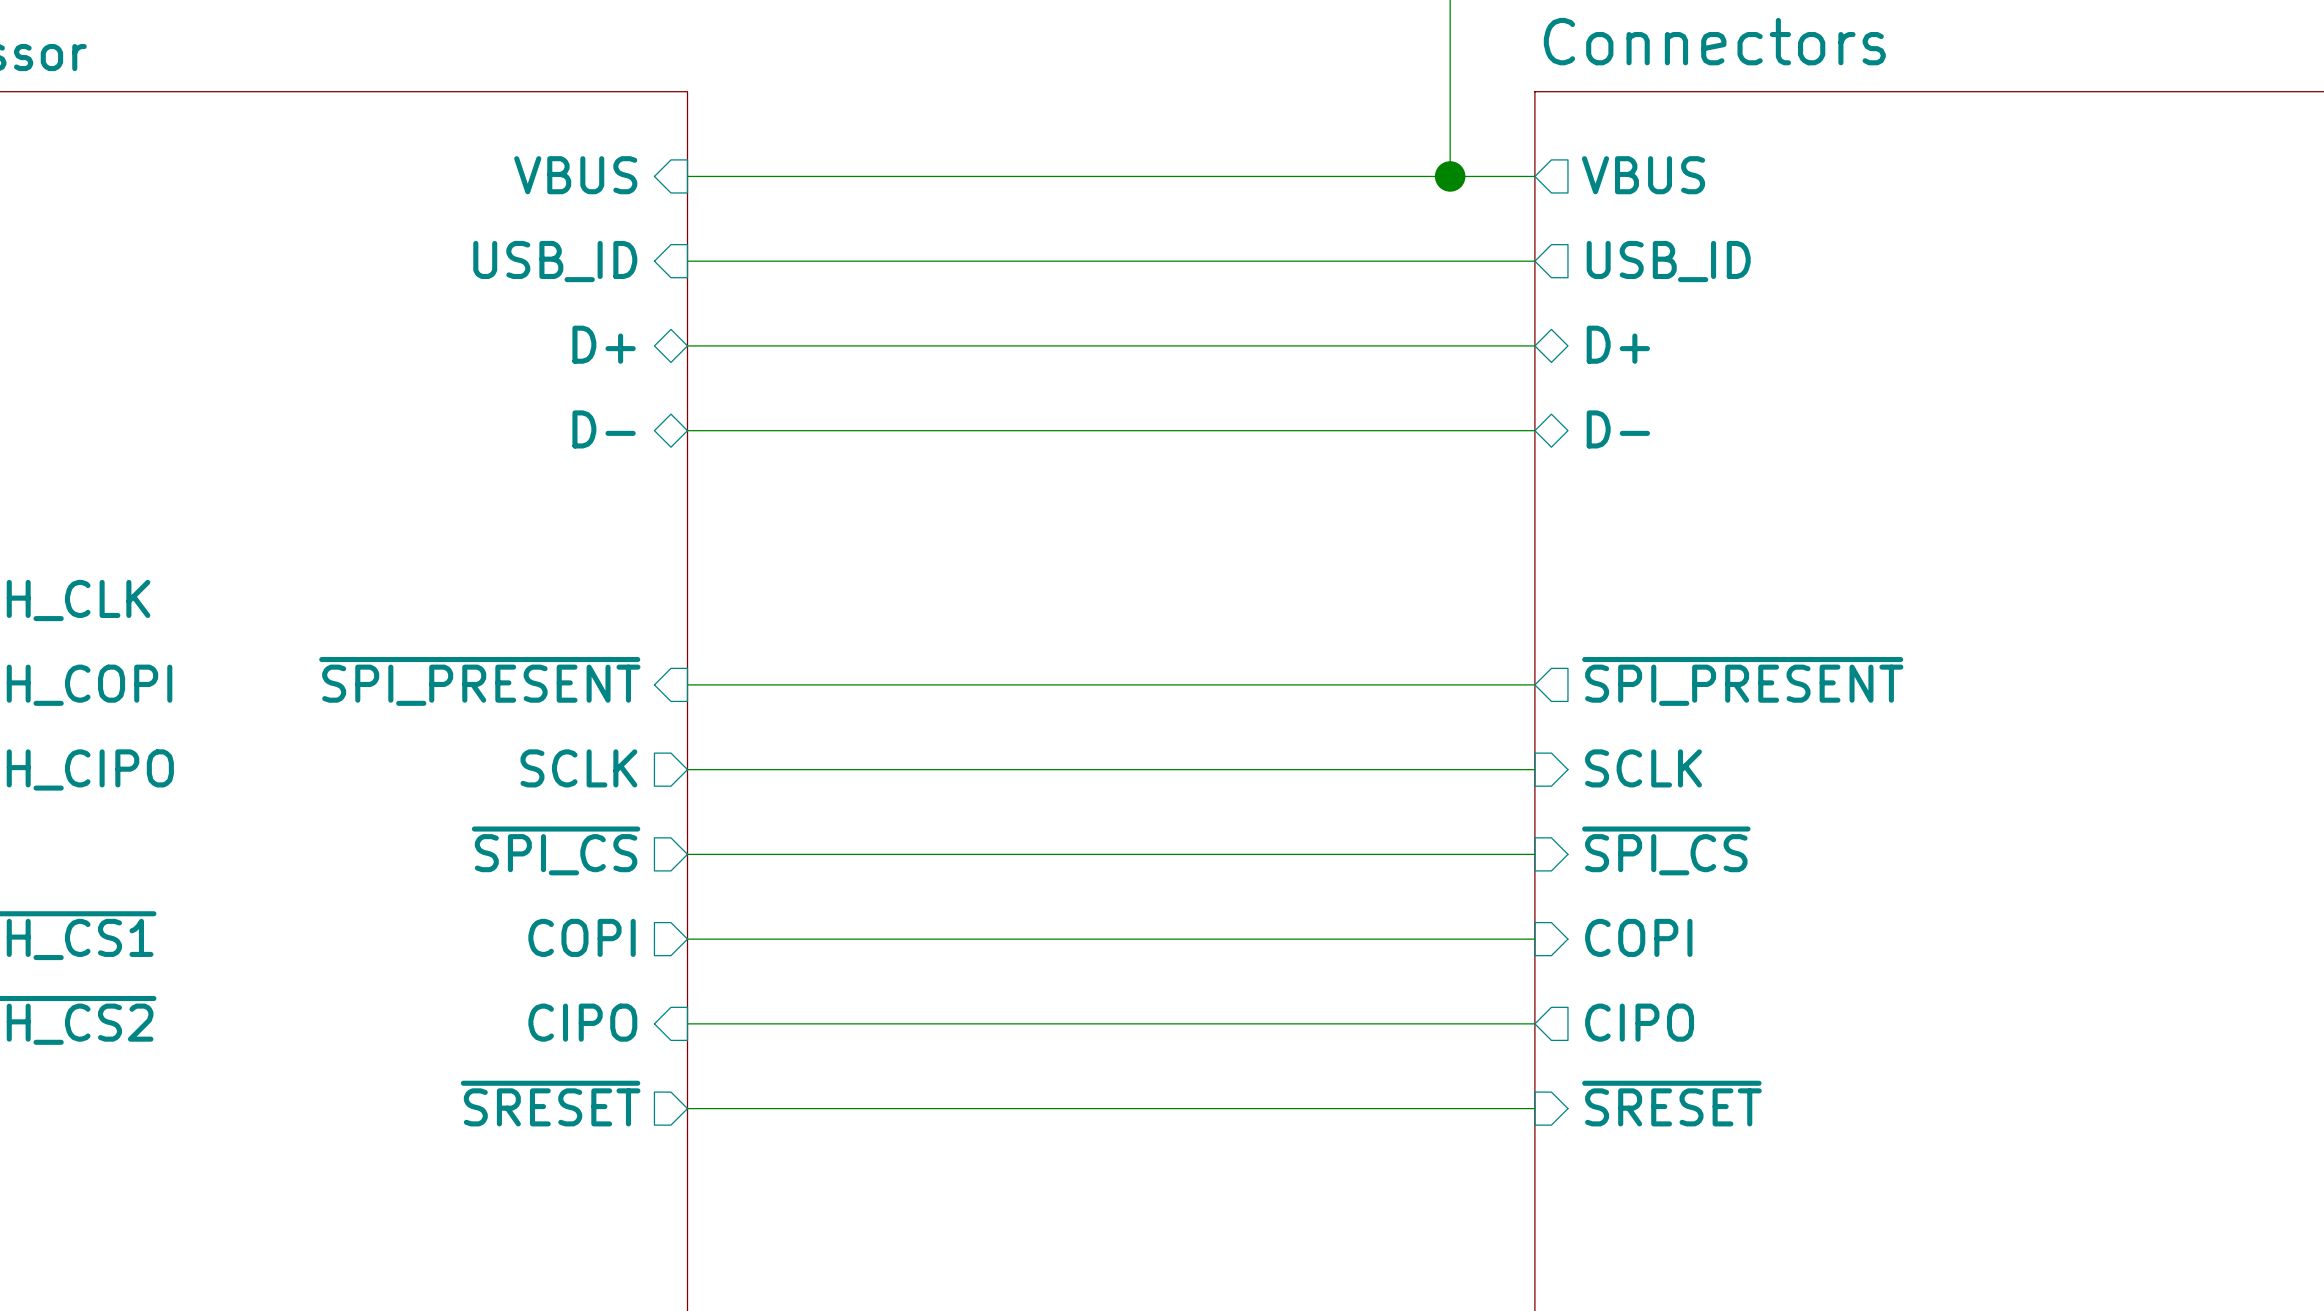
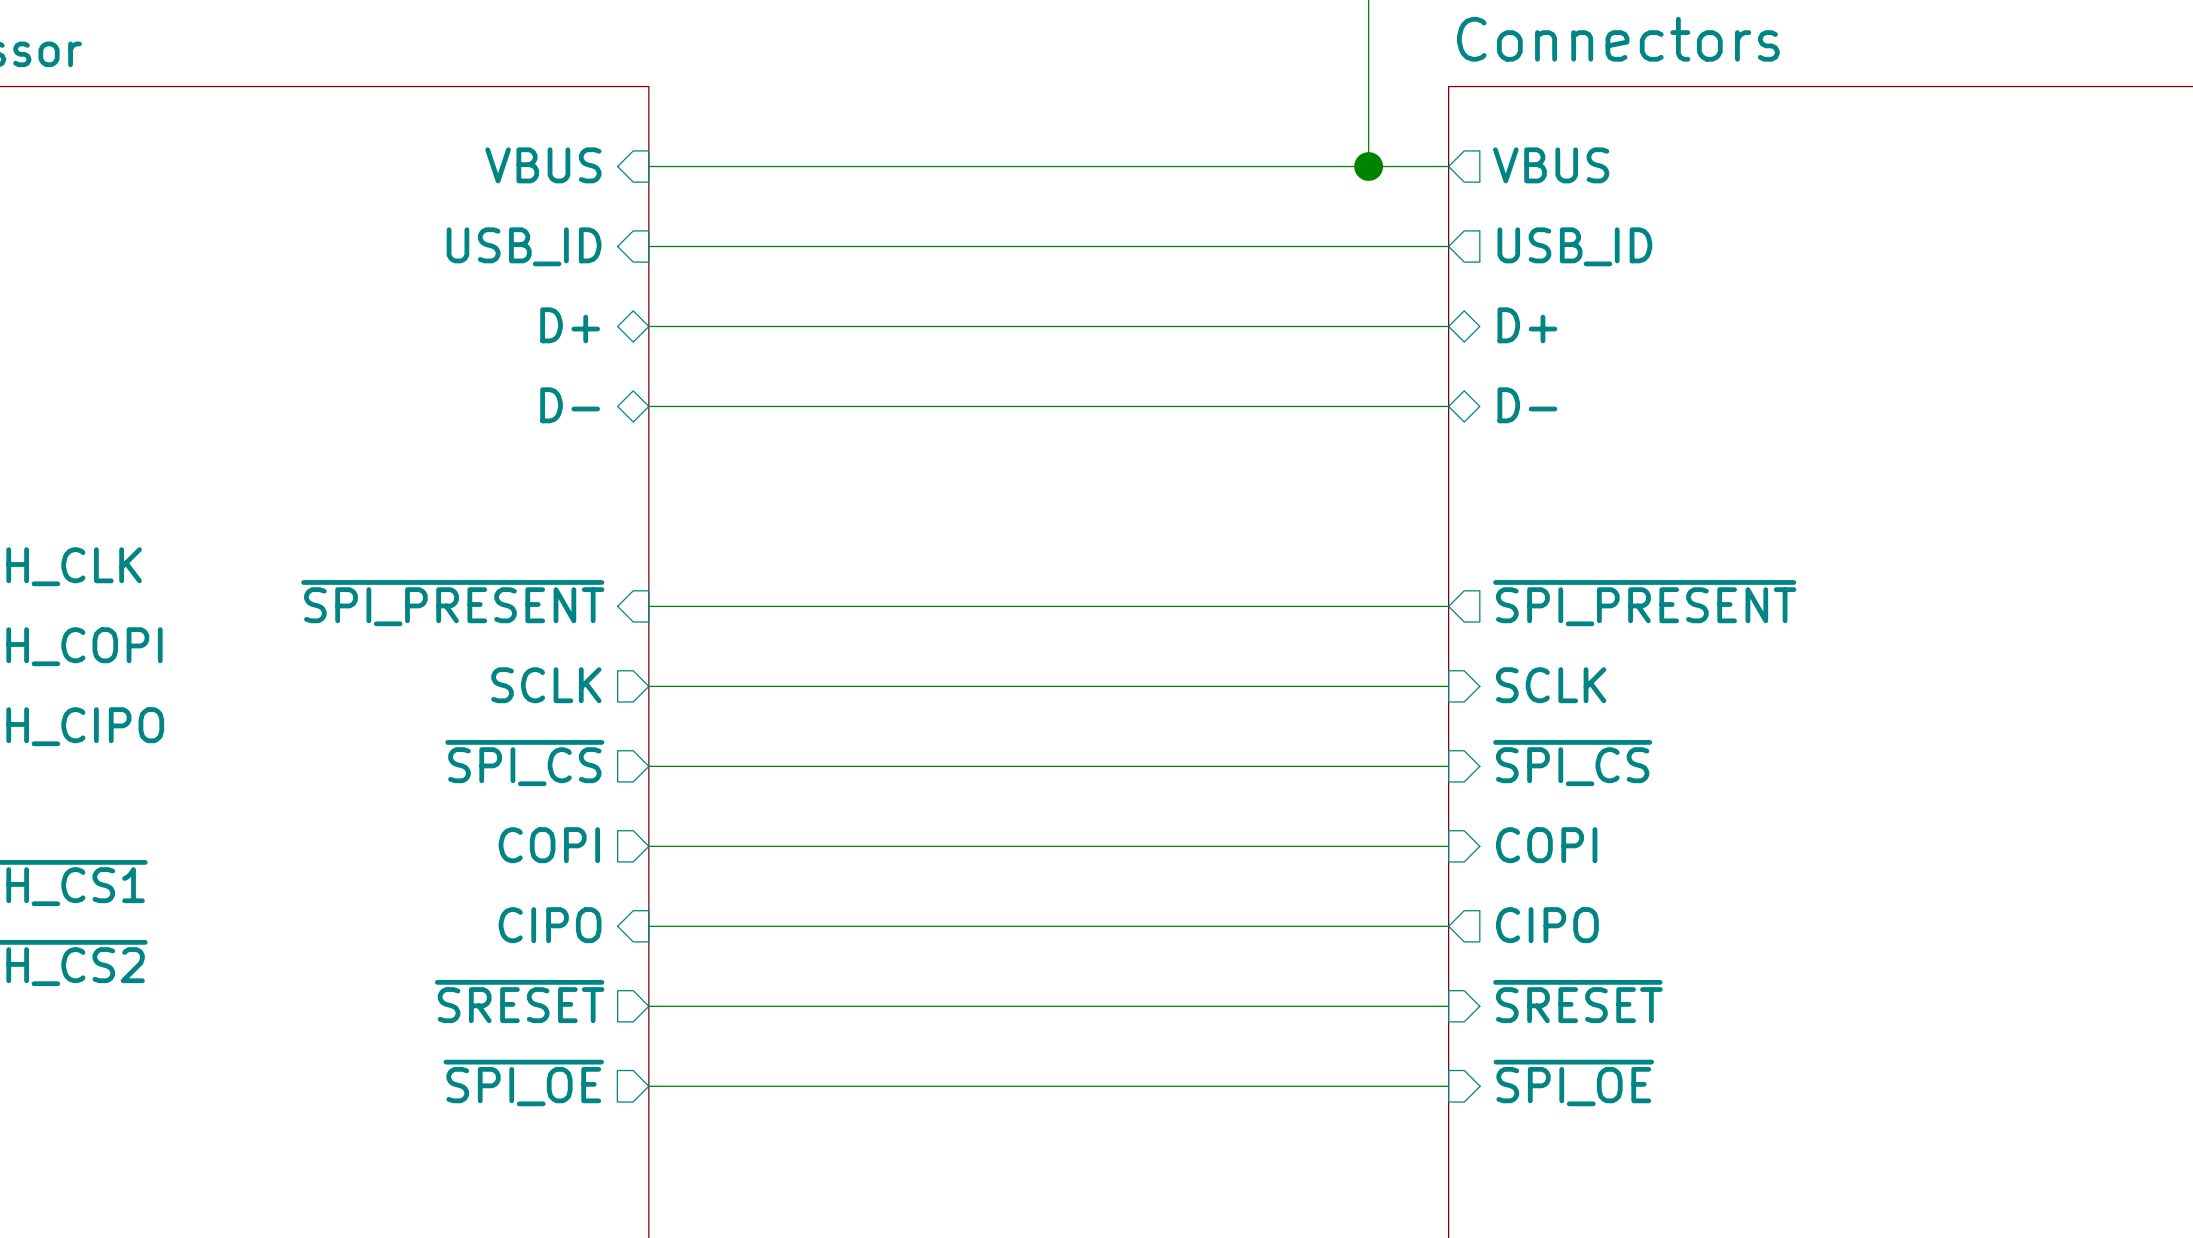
sheet pin position: ~{SPI_PRESENT} (479, 681) -> ~{SPI_PRESENT} (452, 603)
sheet pin position: ~{SPI_PRESENT} (1742, 681) -> ~{SPI_PRESENT} (1644, 603)
wire: (687, 684) (1534, 684) -> (648, 606) (1448, 606)
sheet pin position: SCLK (578, 768) -> SCLK (546, 685)
sheet pin position: SCLK (1643, 768) -> SCLK (1551, 685)
wire: (687, 769) (1534, 769) -> (648, 766) (1448, 766)
sheet pin position: ~{SPI_CS} (556, 850) -> ~{SPI_CS} (524, 763)
sheet pin position: ~{SPI_CS} (1666, 850) -> ~{SPI_CS} (1572, 763)
wire: (687, 854) (1534, 854) -> (648, 686) (1448, 686)
sheet pin position: COPI (582, 937) -> COPI (549, 845)
sheet pin position: COPI (1638, 937) -> COPI (1546, 845)
wire: (687, 939) (1534, 939) -> (648, 846) (1448, 846)
sheet pin position: CIPO (582, 1022) -> CIPO (550, 925)
sheet pin position: CIPO (1639, 1022) -> CIPO (1547, 925)
wire: (687, 1023) (1534, 1023) -> (648, 926) (1448, 926)
sheet pin position: ~{SRESET} (550, 1103) -> ~{SRESET} (519, 1001)
sheet pin position: ~{SRESET} (1671, 1103) -> ~{SRESET} (1577, 1001)
wire: (687, 1108) (1534, 1108) -> (648, 1006) (1448, 1006)
sheet pin: none -> ~{SPI_OE} (523, 1082)
sheet pin: none -> ~{SPI_OE} (1573, 1082)
wire: none -> (648, 1086) (1448, 1086)

